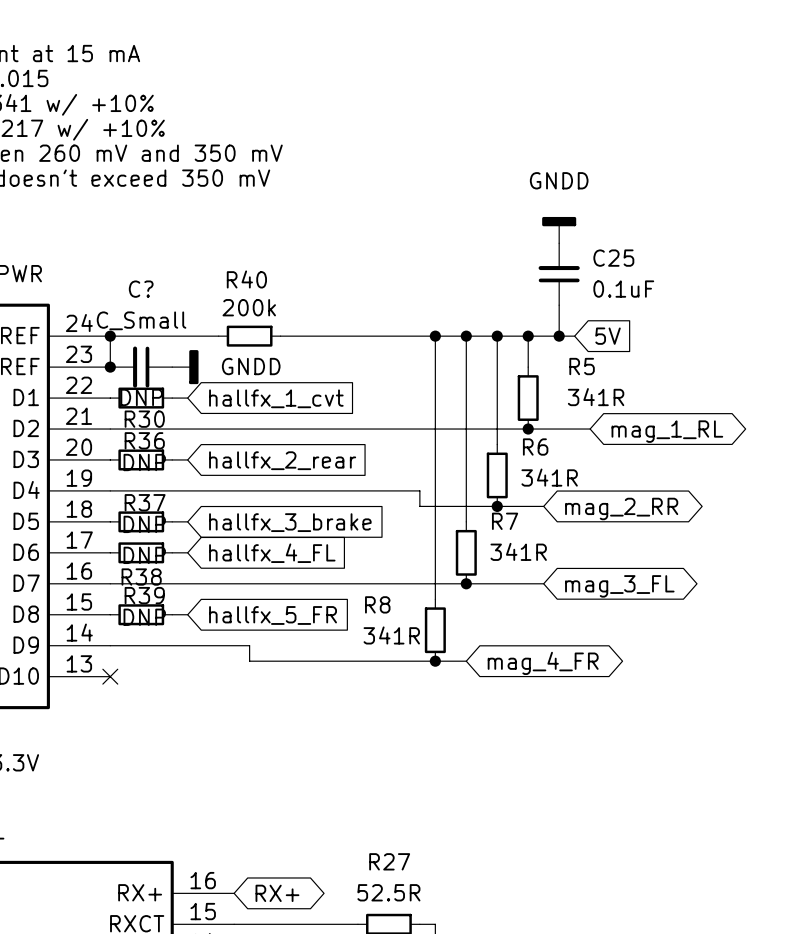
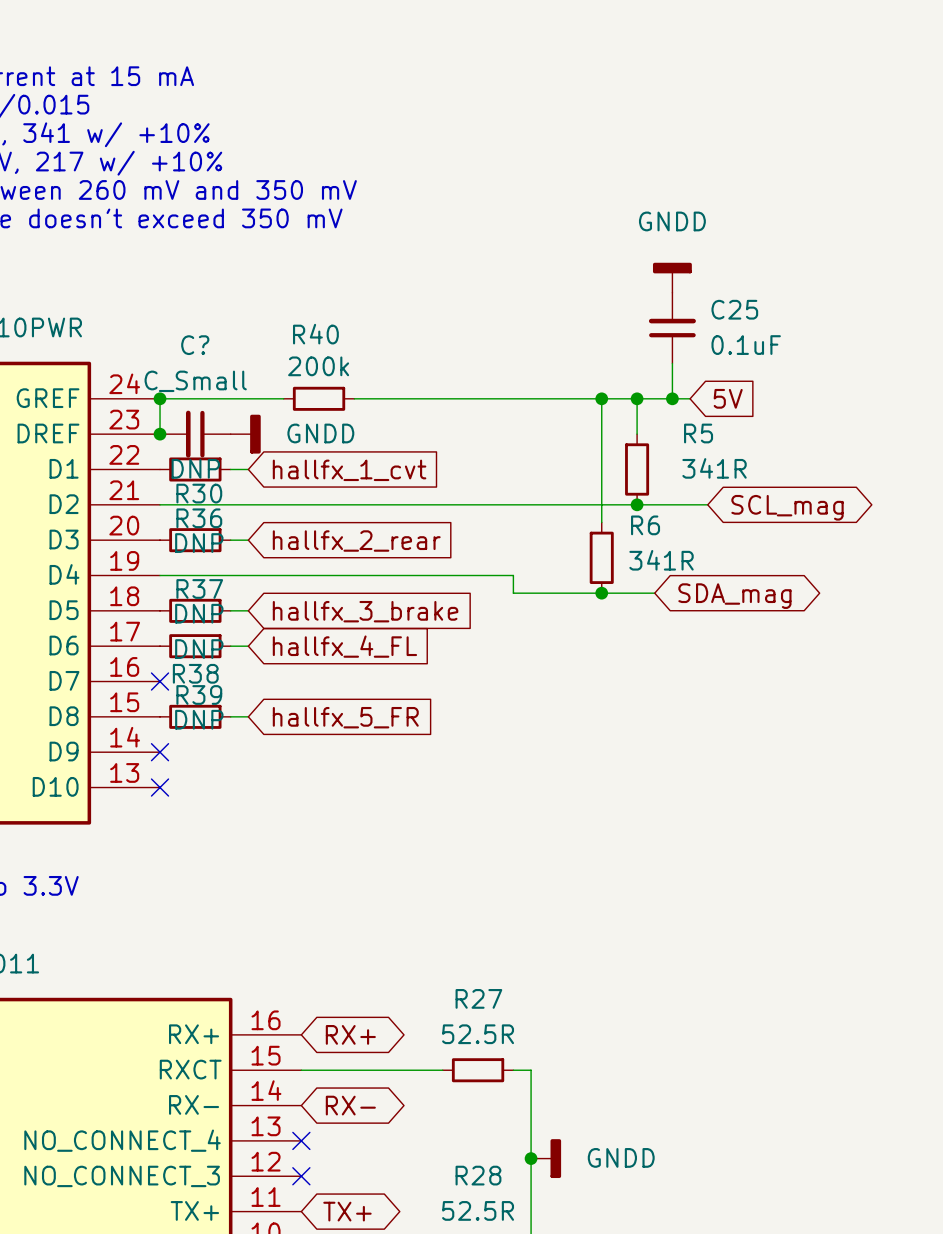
wire: (435, 336) (435, 599) -> none
junction: (435, 336) -> none
wire: (466, 336) (466, 521) -> none
junction: (466, 336) -> none
global label: mag_1_RL (667, 431) -> SCL_mag (787, 507)
global label: mag_2_RR (621, 508) -> SDA_mag (734, 596)
R7: 341R (466, 552) -> none
wire: (110, 583) (543, 583) -> none
no-connect mark: none -> (160, 681)
junction: (466, 583) -> none
global label: mag_3_FL (619, 586) -> none
R8: 341R (435, 630) -> none
wire: (110, 645) (249, 645) (249, 661) (466, 661) -> none
no-connect mark: none -> (160, 752)
junction: (435, 661) -> none
global label: mag_4_FR (543, 663) -> none

